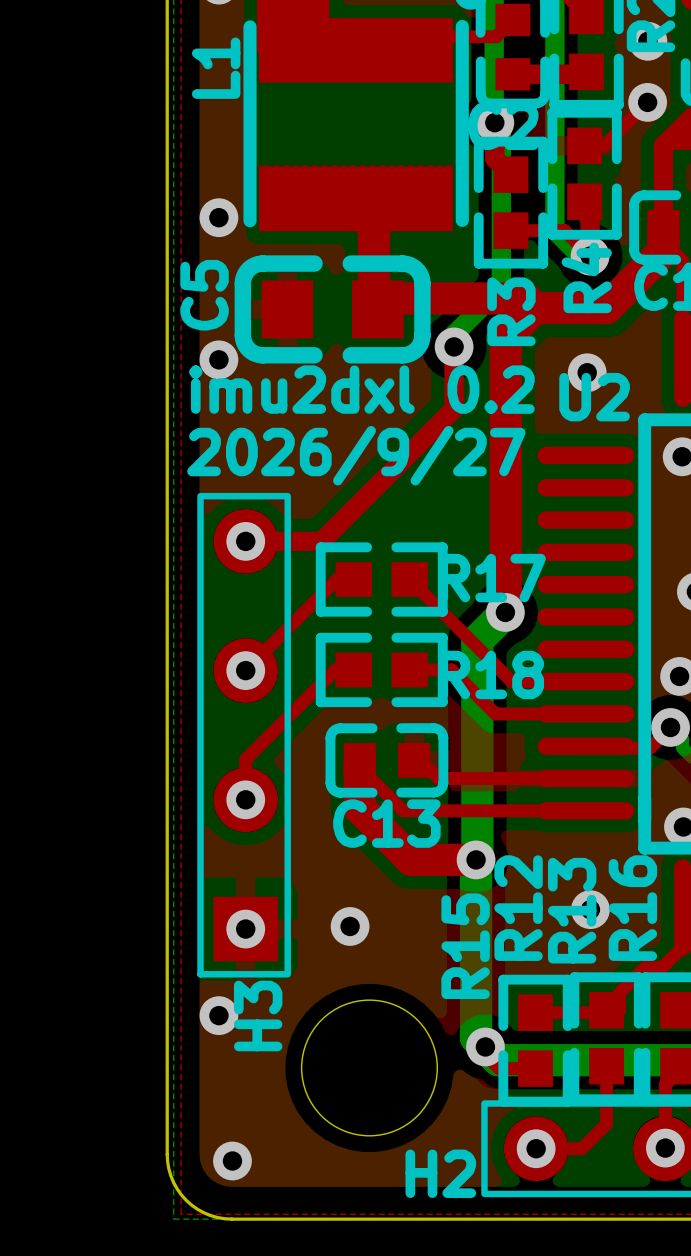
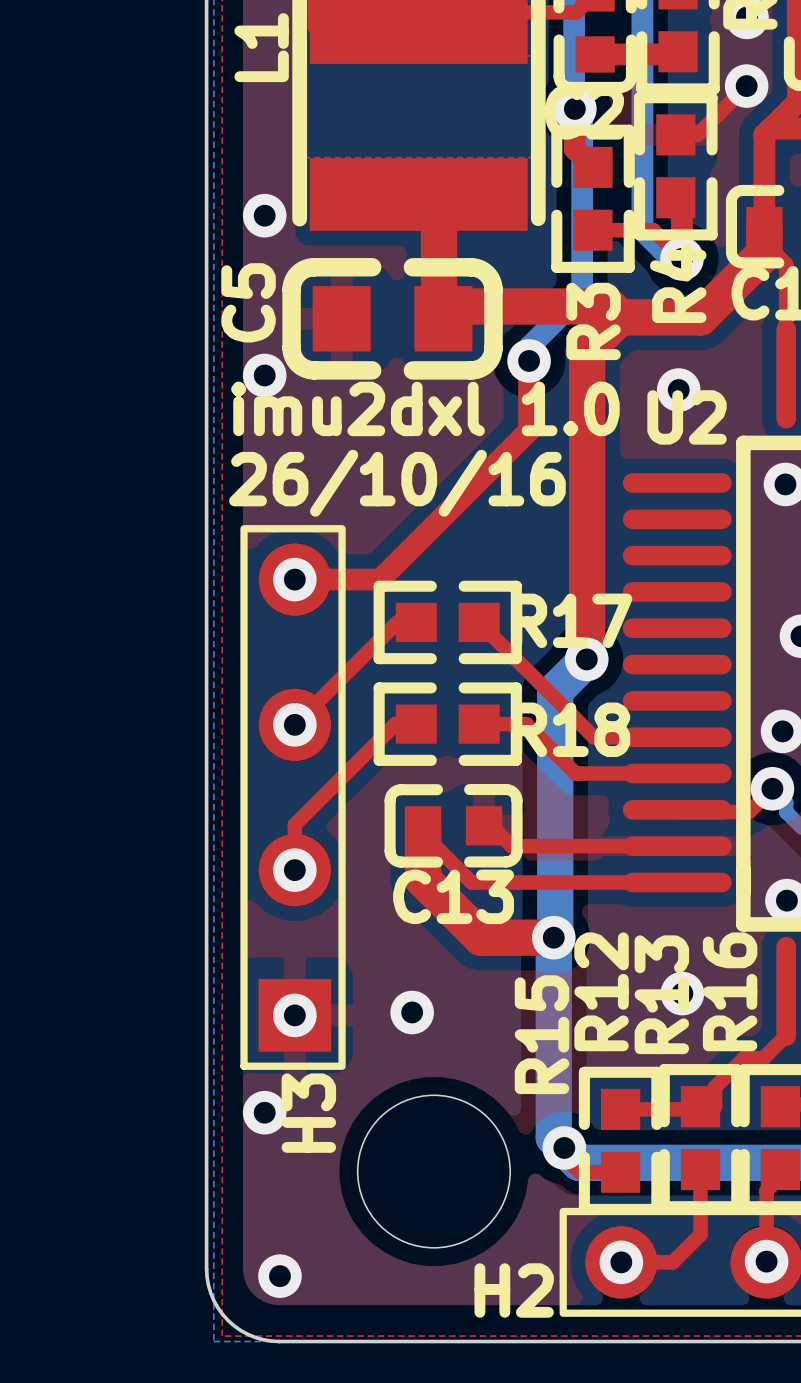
text: imu2dxl 0.2 (361, 389) -> imu2dxl 1.0 (425, 408)
text: 2026/9/27 (356, 455) -> 26/10/16 (397, 483)

